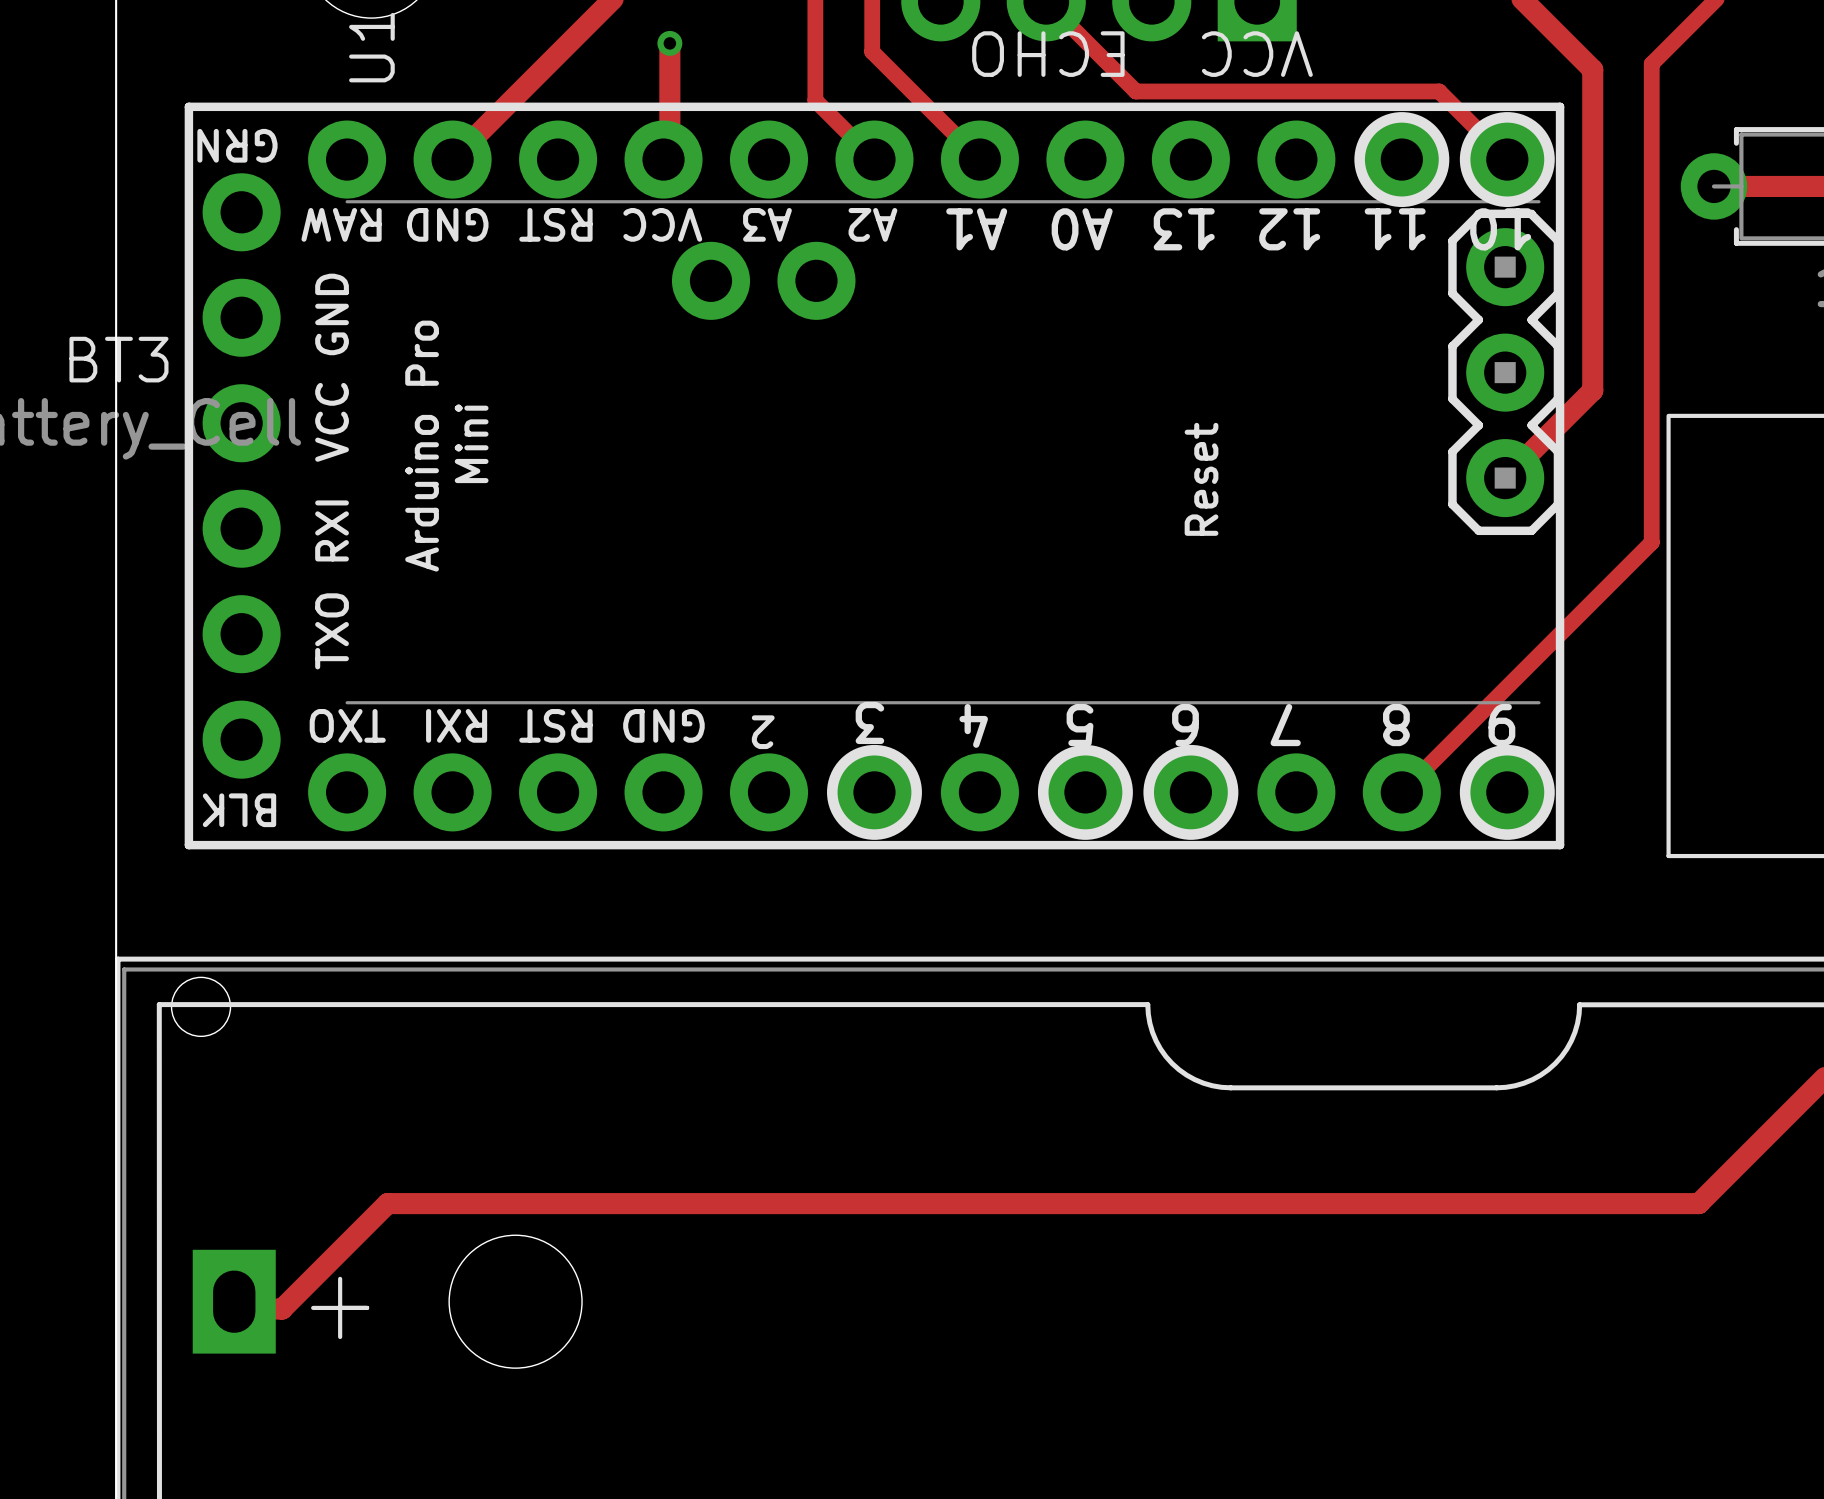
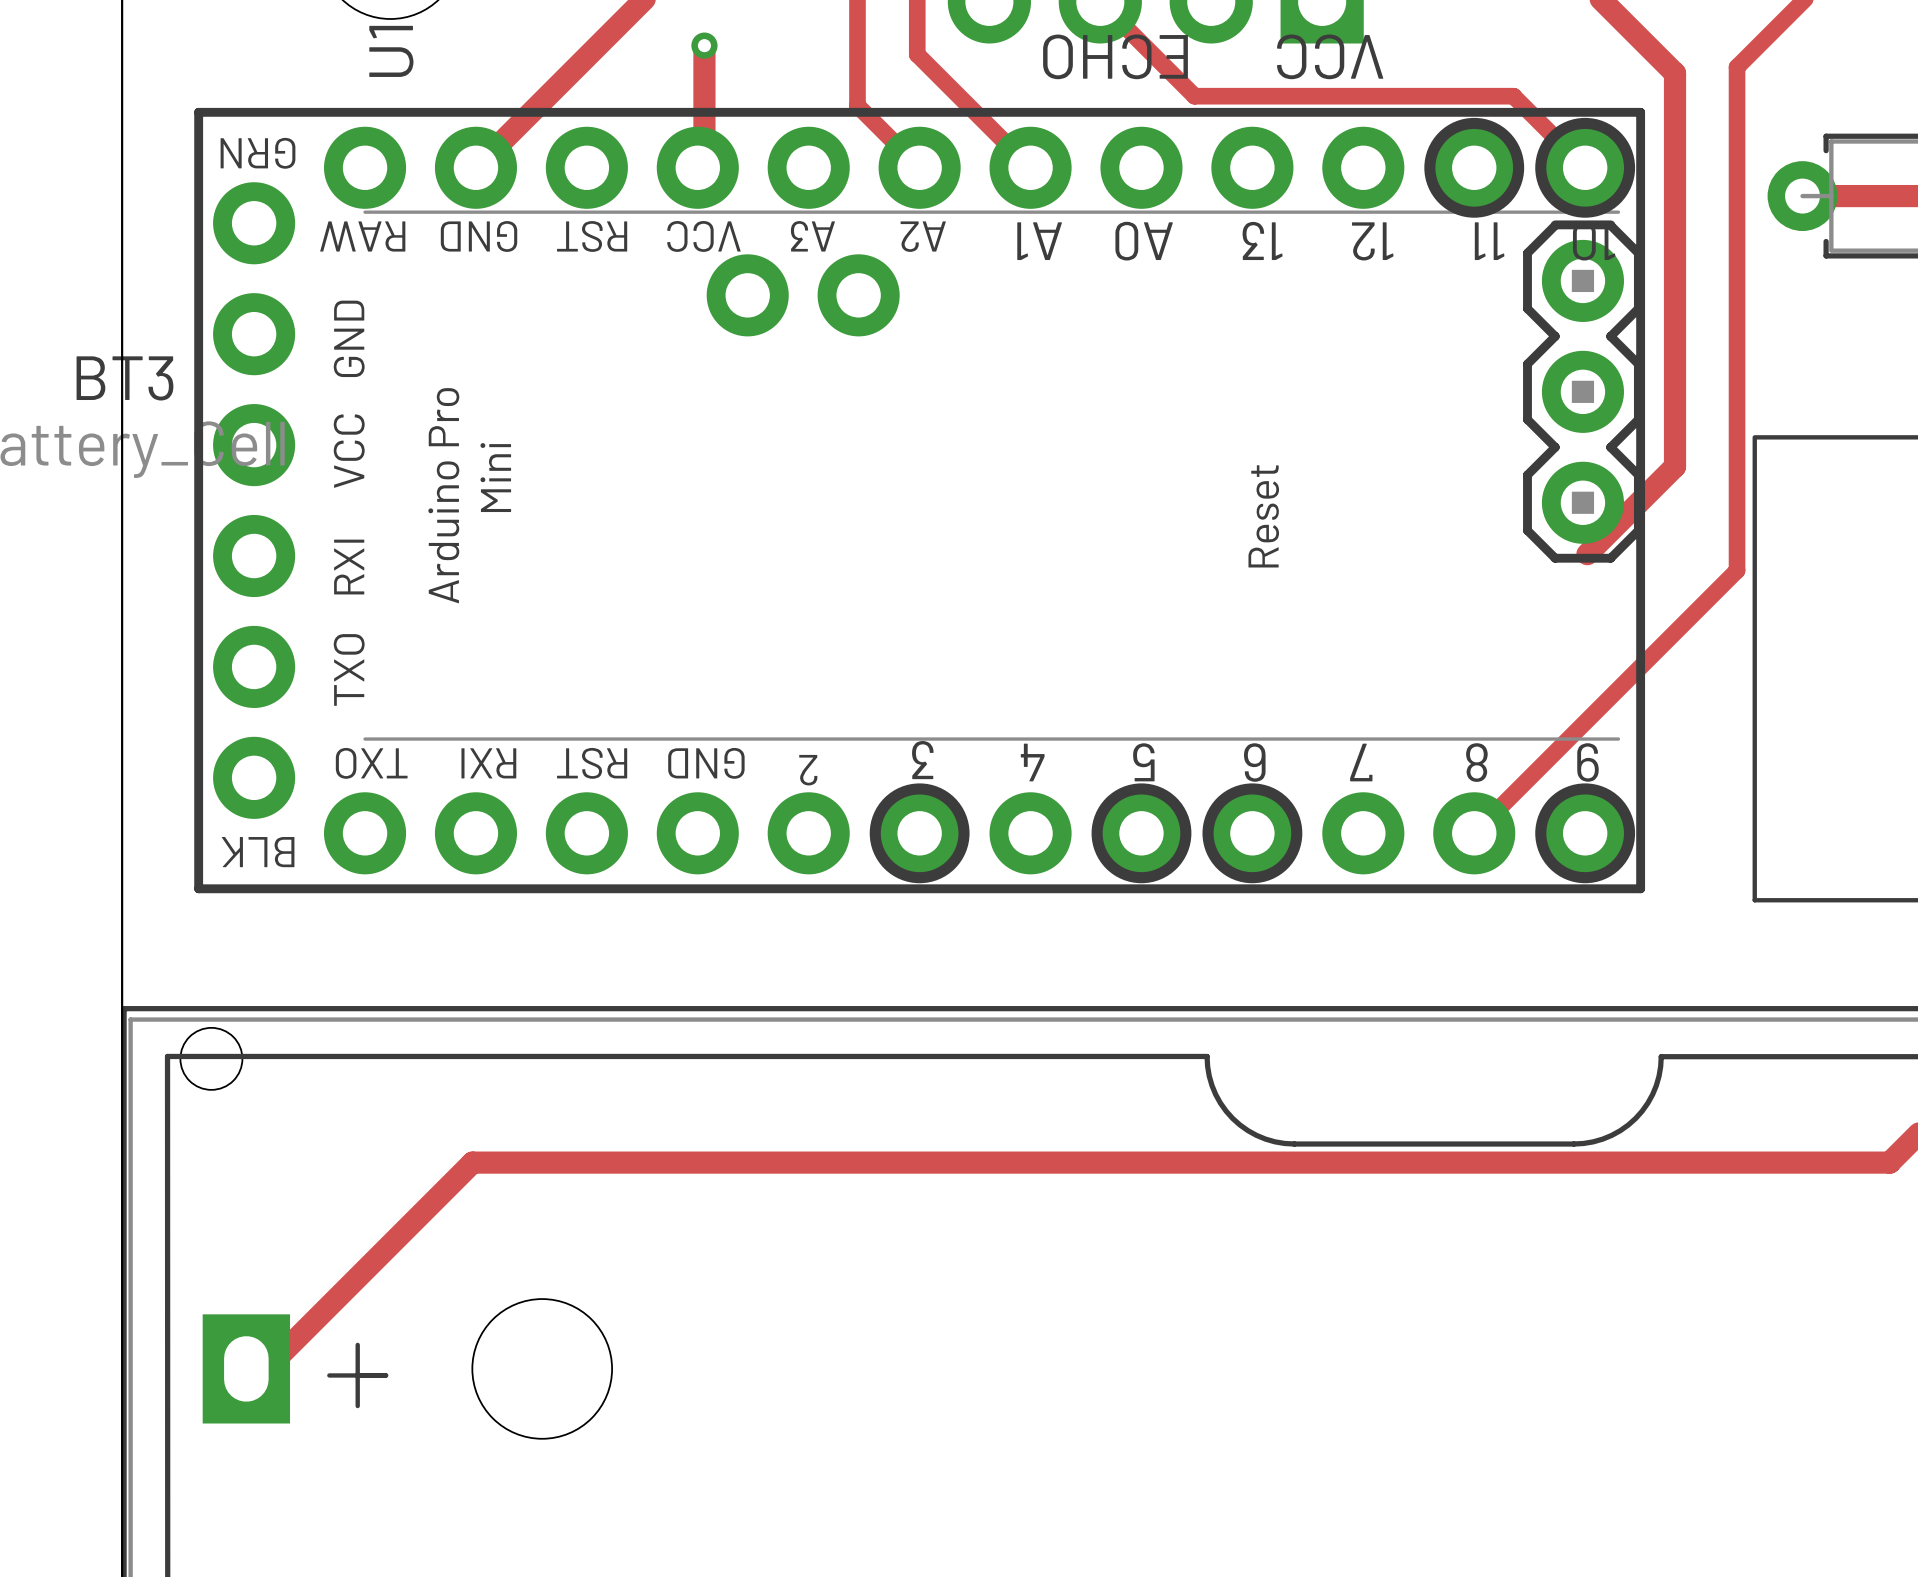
track: (1592, 390) (1505, 478) -> (1675, 410) (1675, 466) (1587, 554)
track: (1796, 1105) (1698, 1203) (387, 1203) (282, 1309) (247, 1309) -> (1889, 1162) (472, 1162) (260, 1374) (260, 1376)

